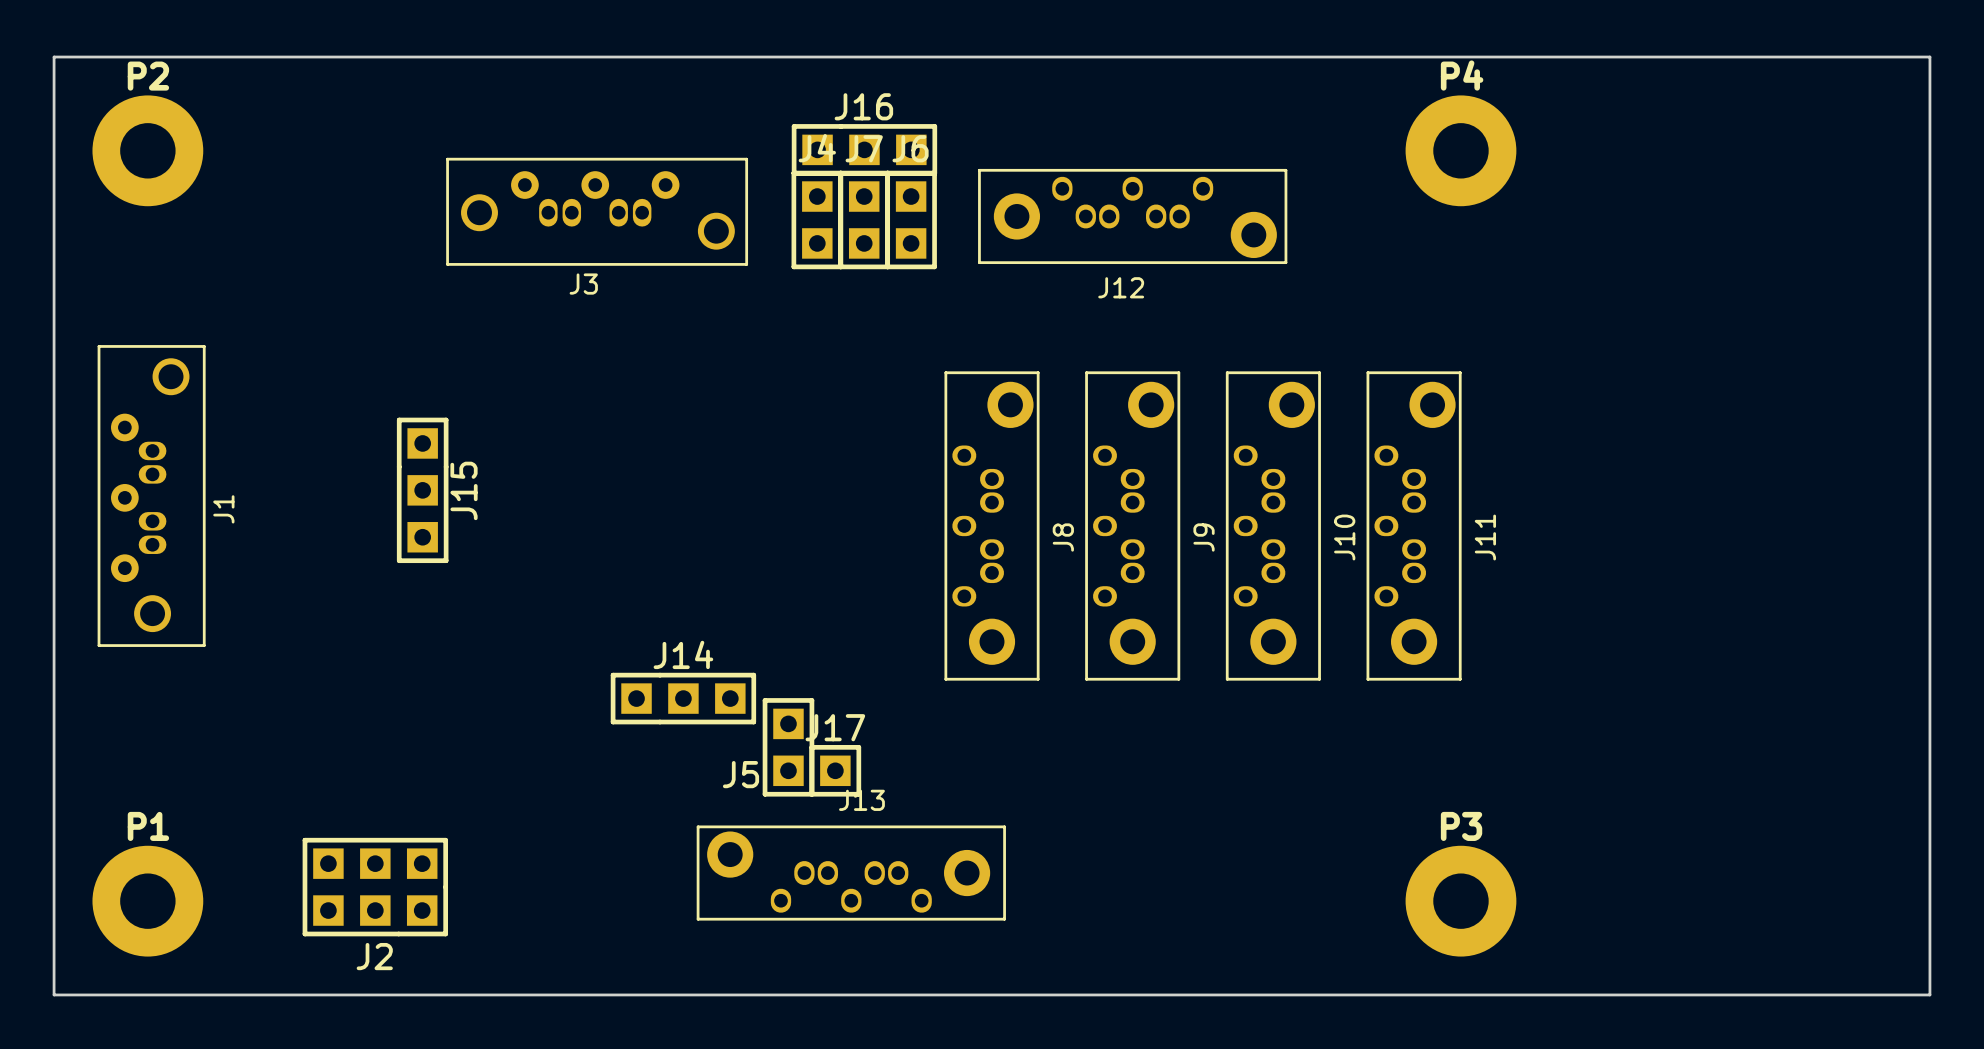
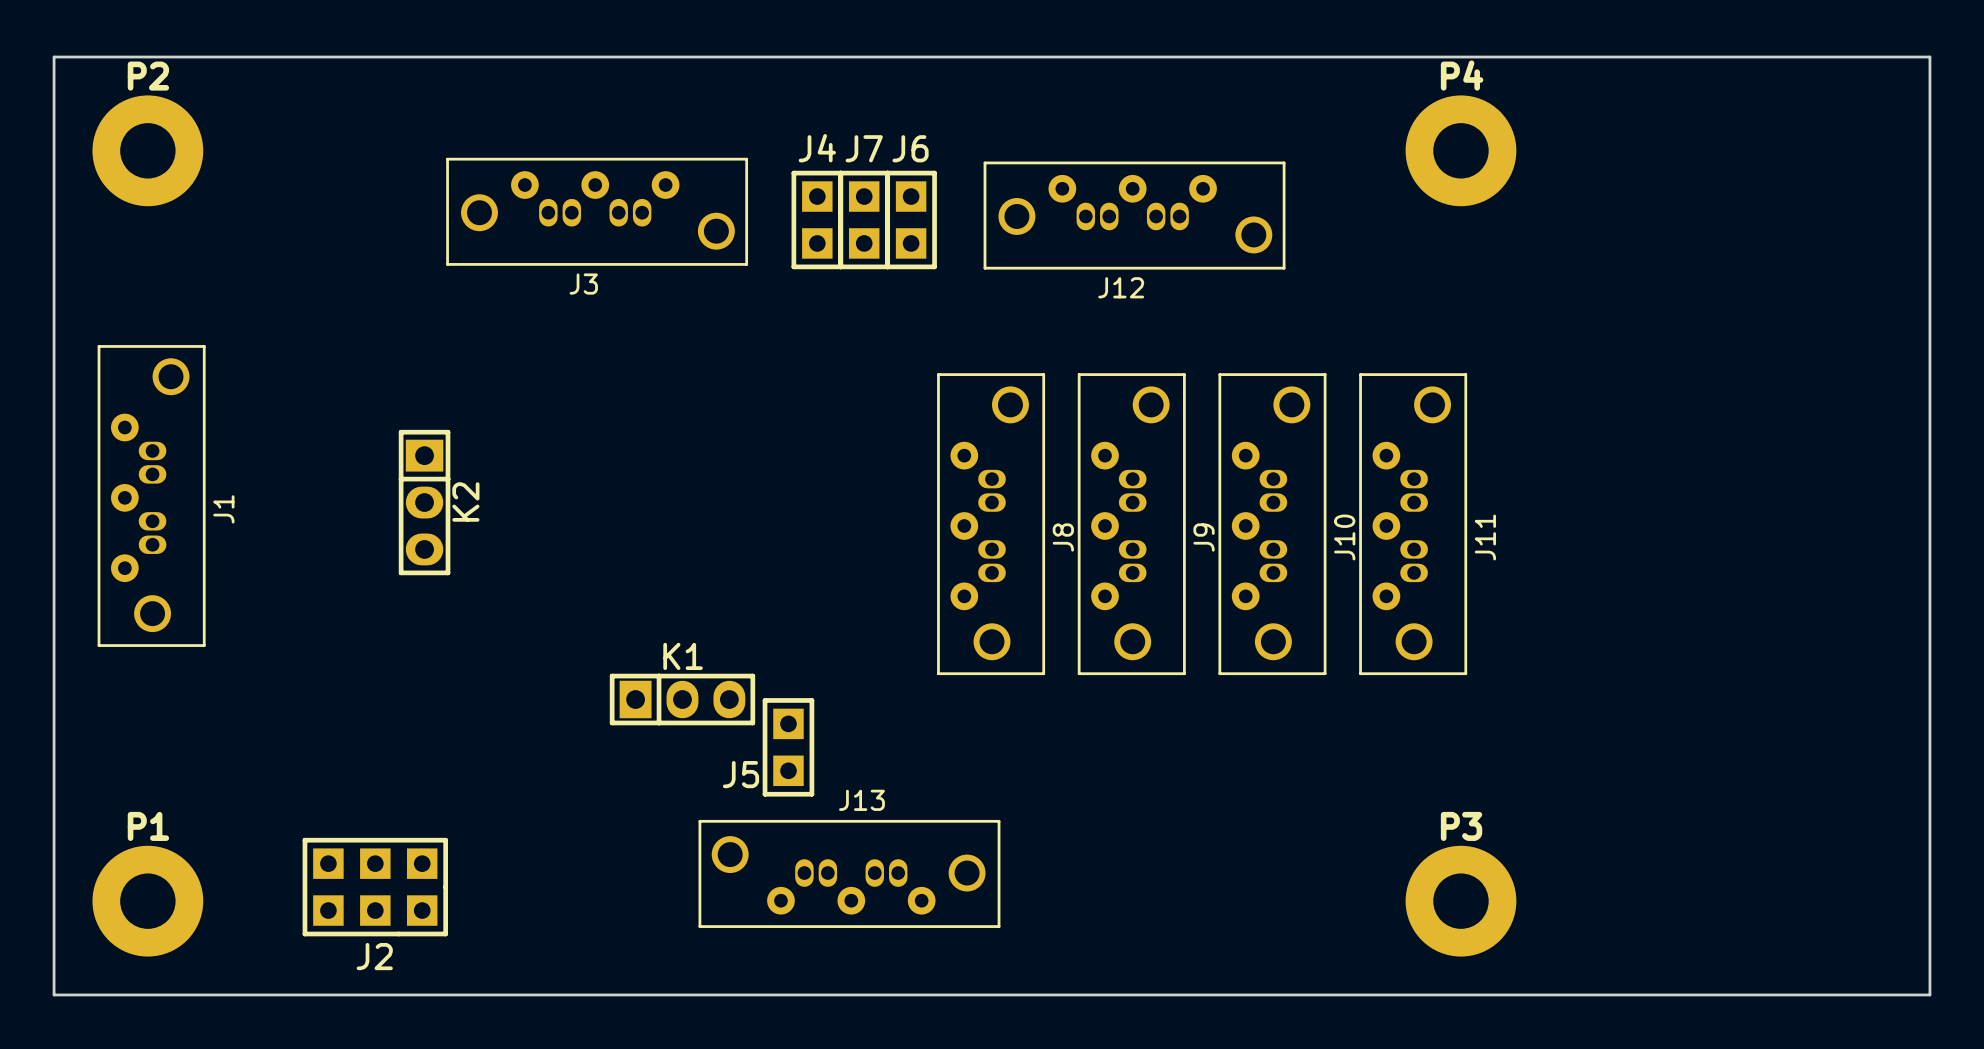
J16: (864, 149) -> none
J12 footprint: [978, 168, 1288, 265] -> [983, 161, 1286, 270]
J8 footprint: [944, 371, 1040, 681] -> [937, 373, 1046, 676]
J9 footprint: [1085, 371, 1181, 681] -> [1077, 373, 1186, 676]
J10 footprint: [1225, 371, 1321, 681] -> [1218, 373, 1327, 676]
J11 footprint: [1366, 371, 1462, 681] -> [1359, 373, 1468, 676]
J15: (422, 490) -> none
K2: none -> (424, 502)
J14: (683, 698) -> none
K1: none -> (682, 699)
J17: (835, 770) -> none
J13 footprint: [696, 825, 1006, 921] -> [698, 819, 1001, 928]

